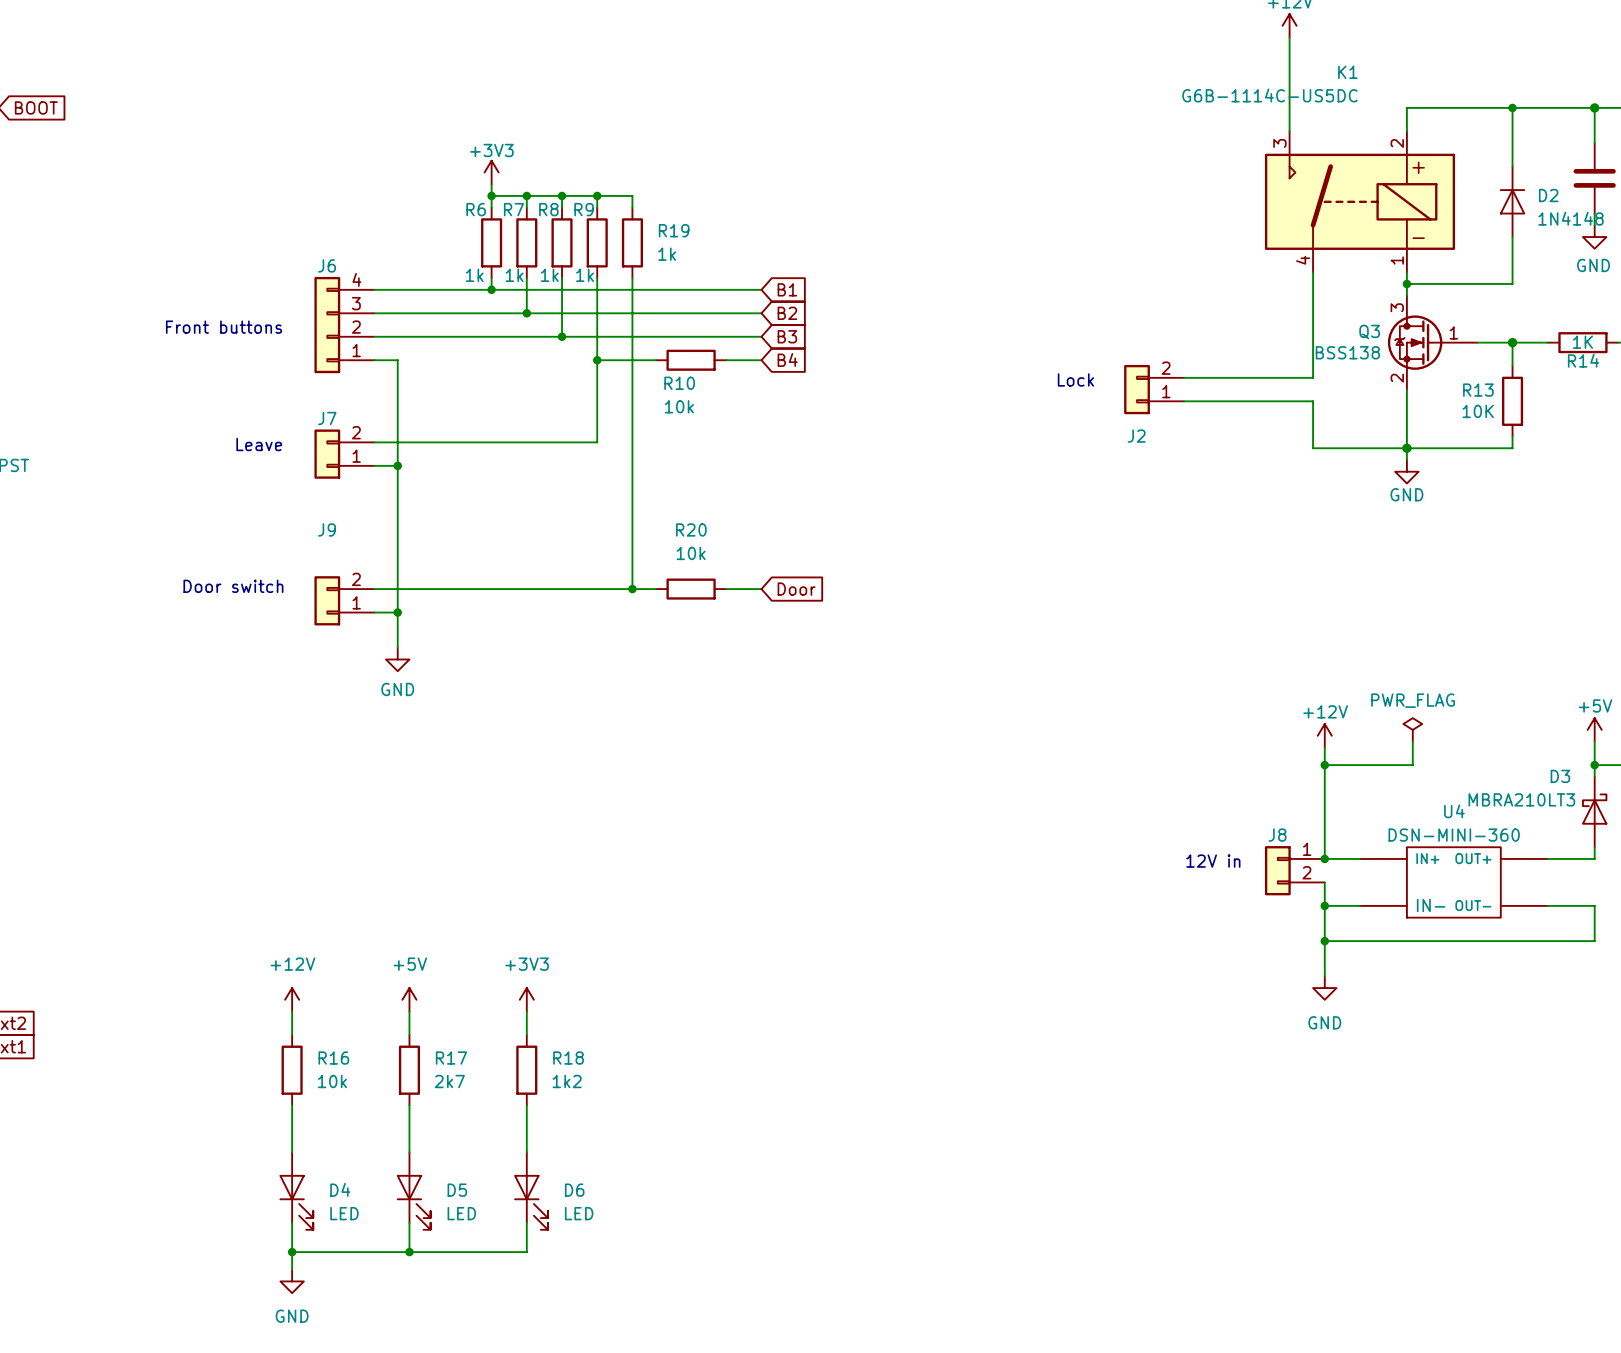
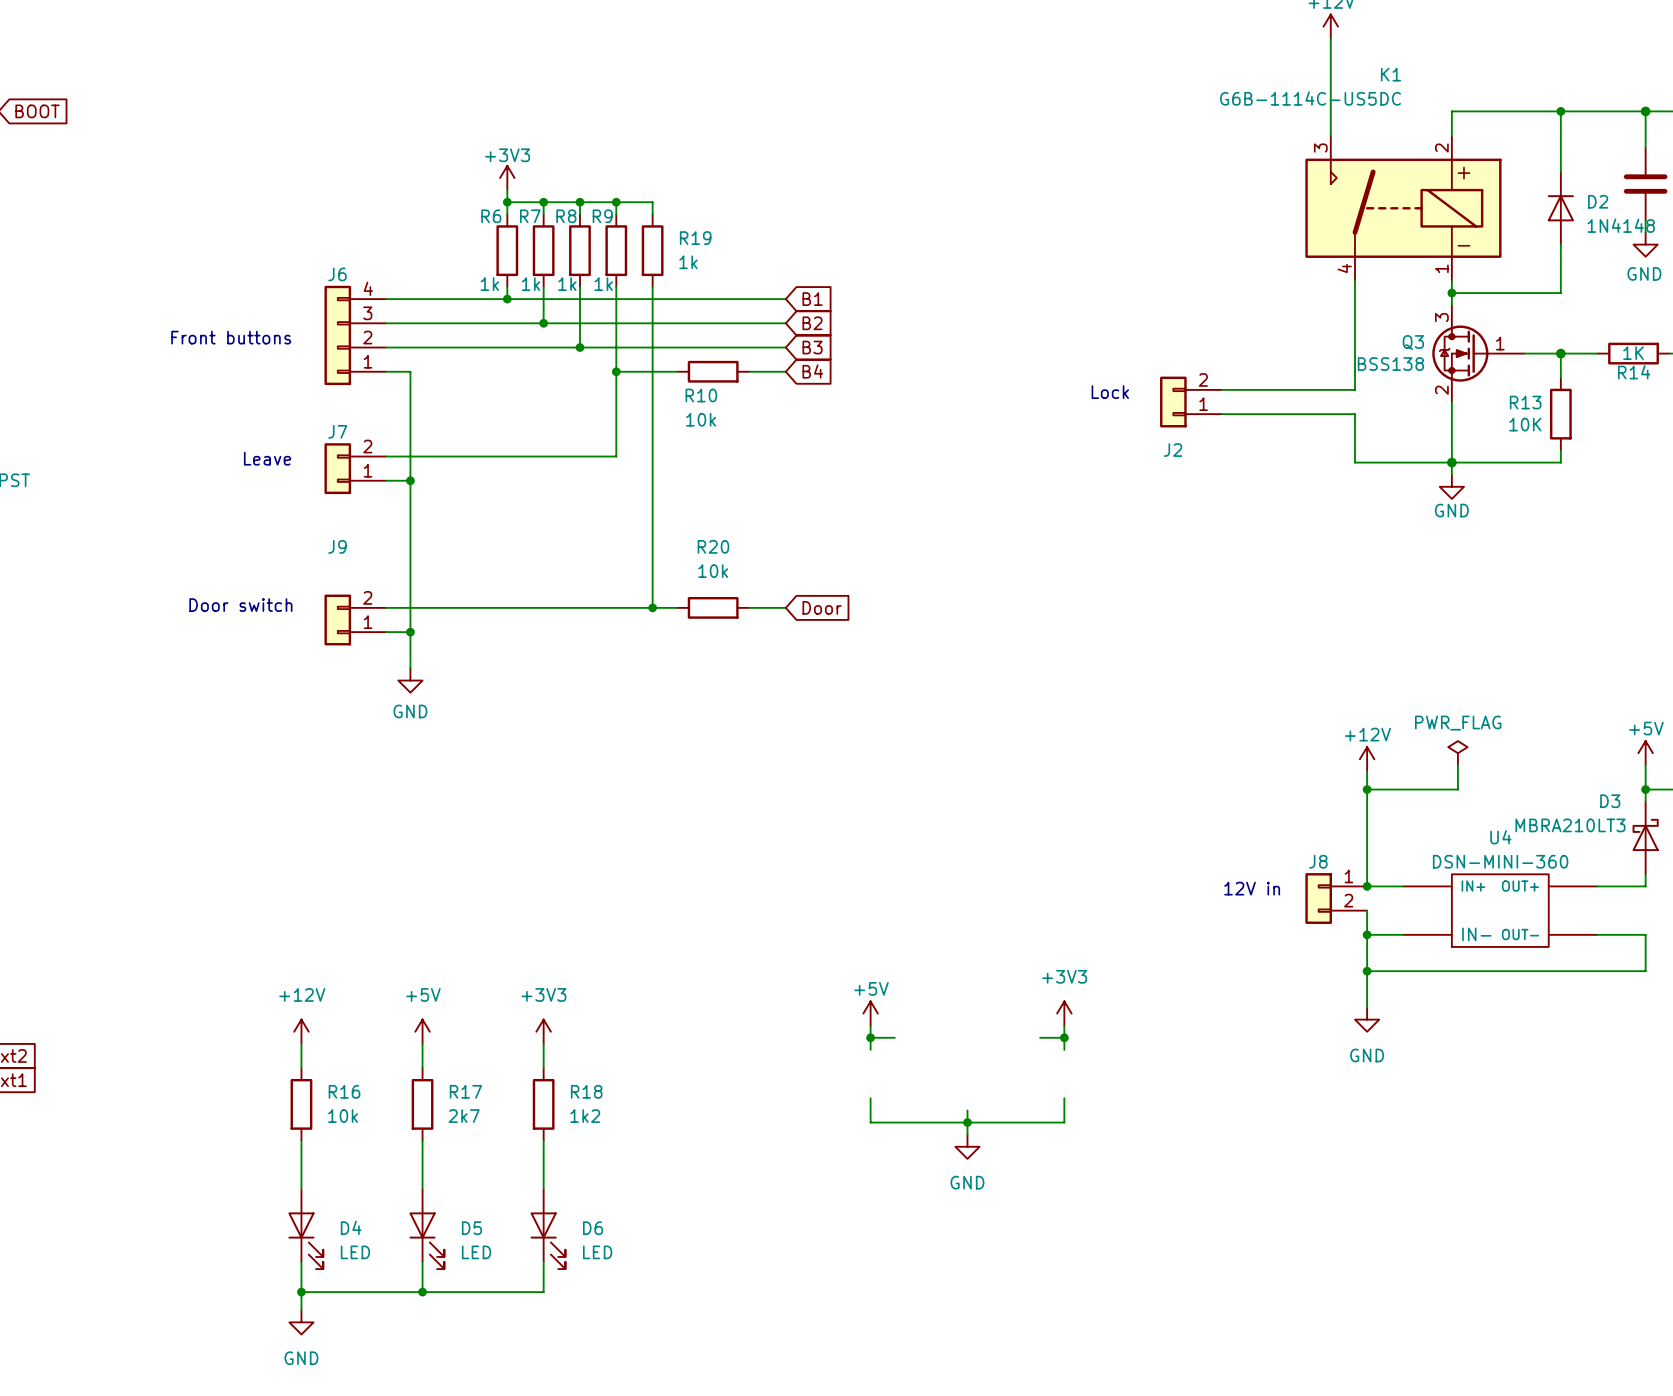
power symbol: none -> +5V (870, 1013)
power symbol: none -> +3V3 (1064, 1013)
wire: none -> (870, 1025) (870, 1049)
wire: none -> (1064, 1025) (1064, 1049)
wire: none -> (870, 1037) (894, 1037)
junction: none -> (870, 1037)
wire: none -> (1040, 1037) (1064, 1037)
junction: none -> (1064, 1037)
wire: none -> (870, 1098) (870, 1122) (1064, 1122) (1064, 1098)
wire: none -> (967, 1110) (967, 1134)
junction: none -> (967, 1122)
power symbol: none -> GND (967, 1146)

